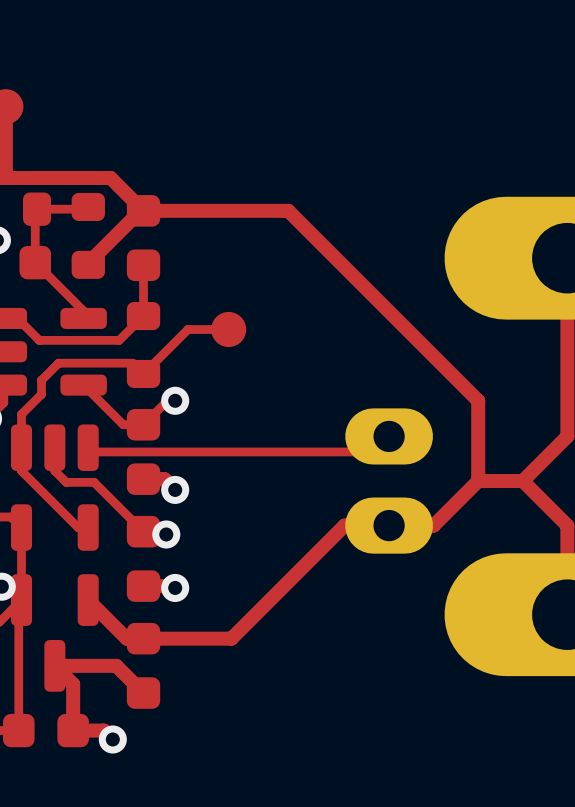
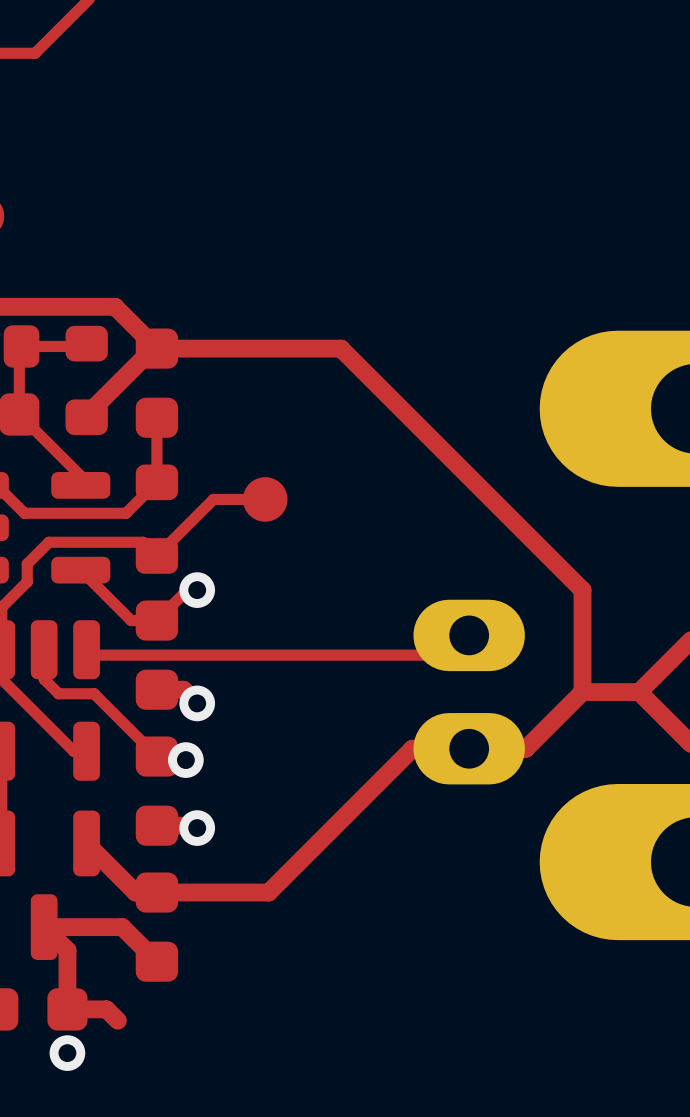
via position: (112, 739) -> (67, 1053)

